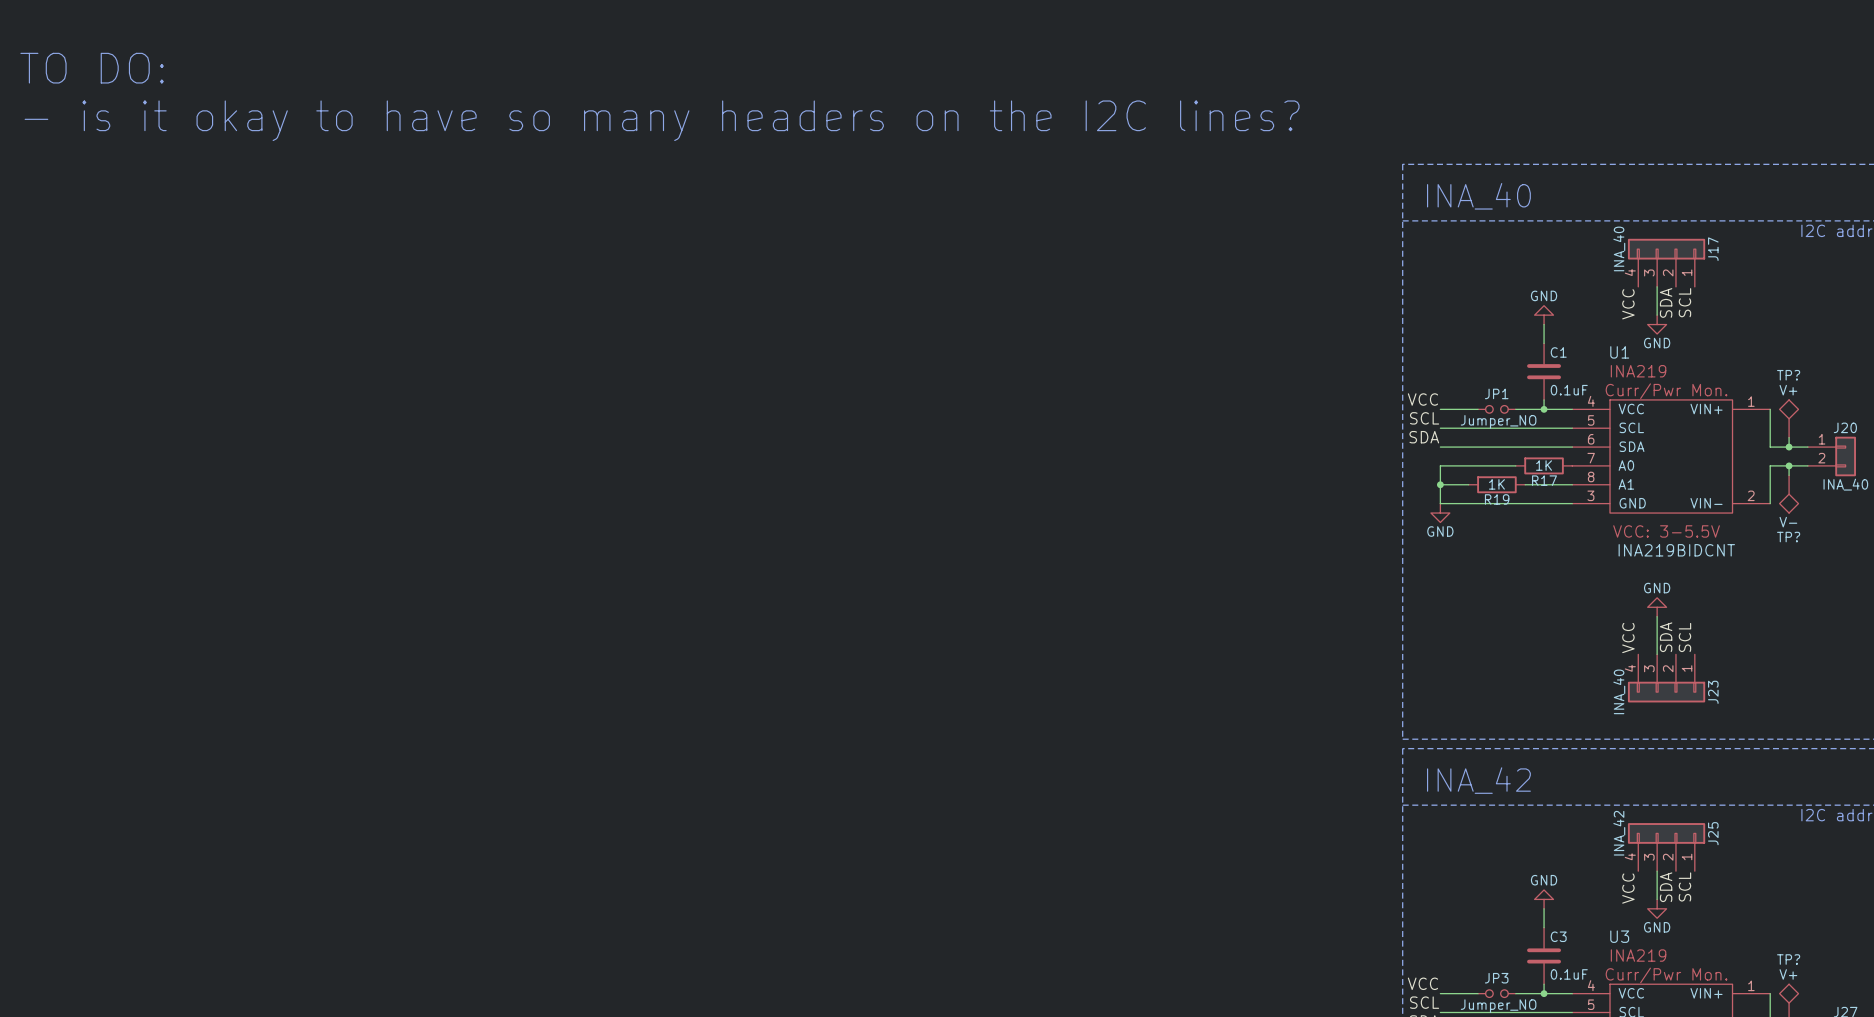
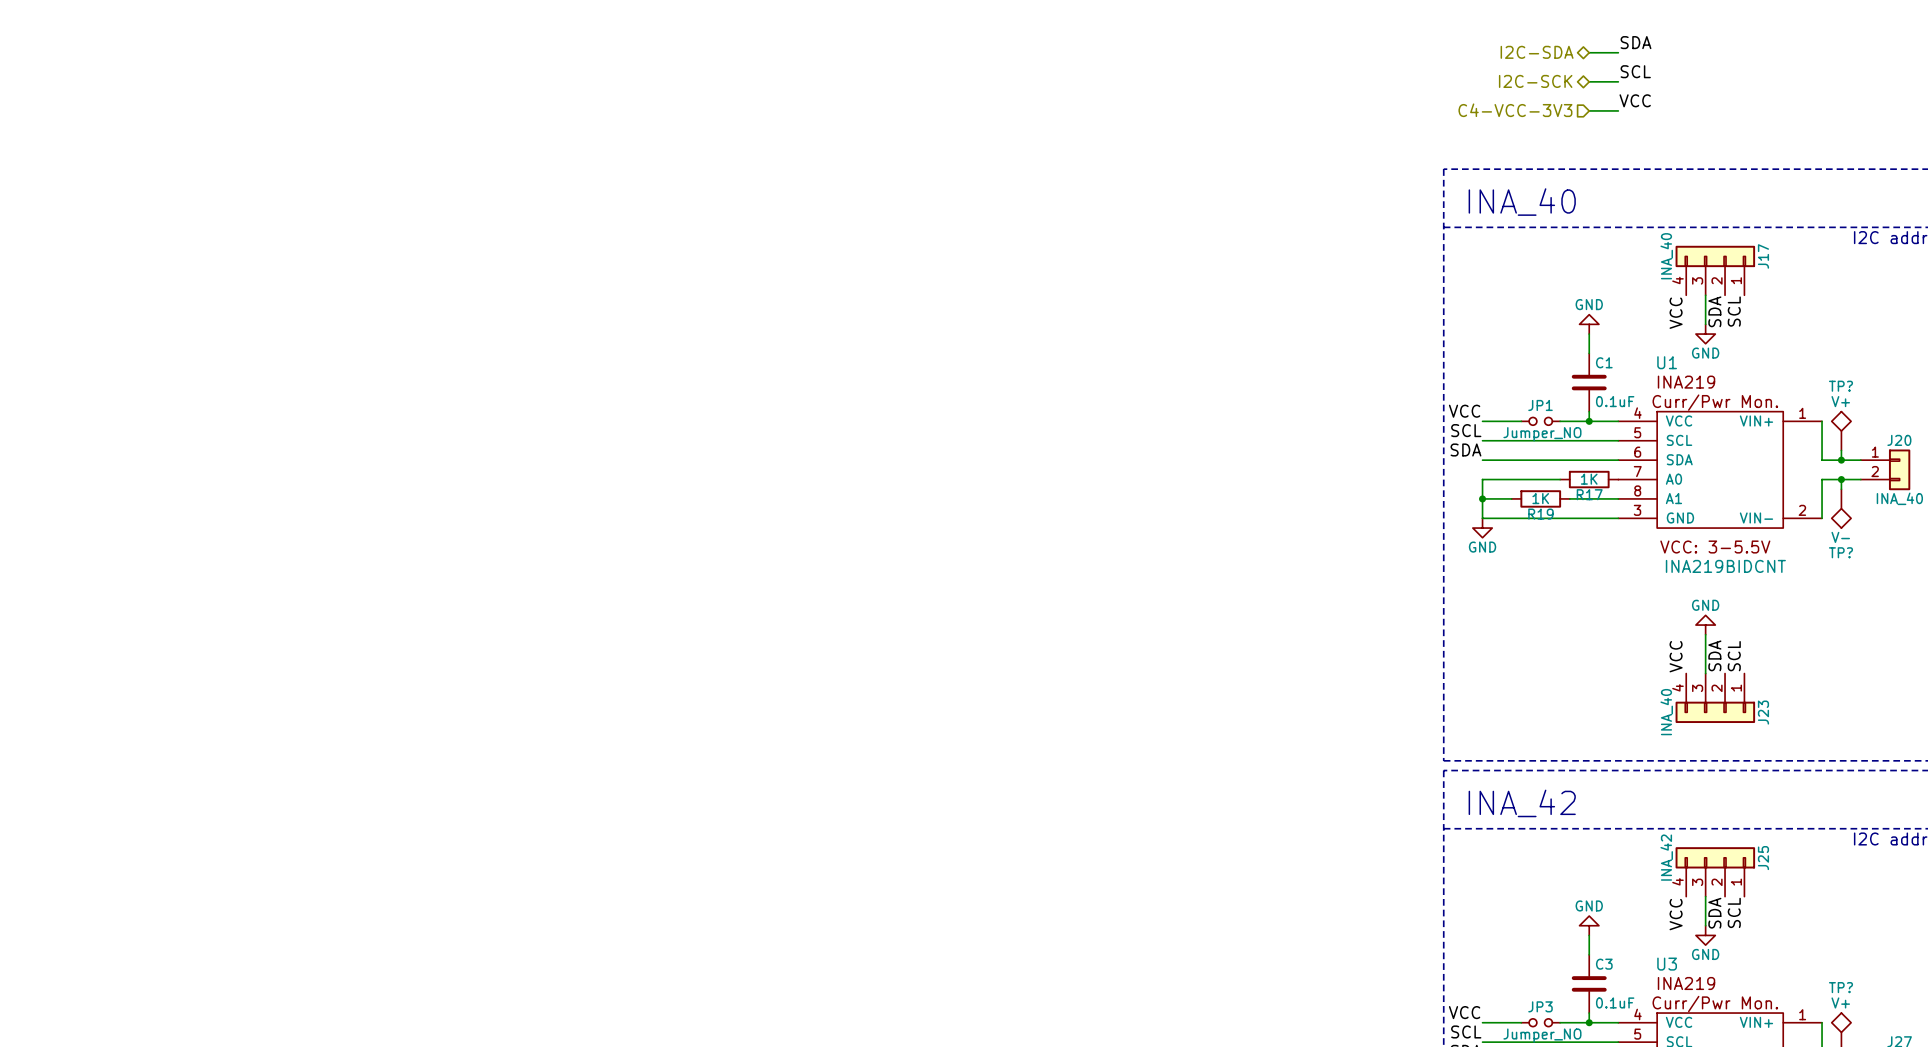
label: none -> SDA (1636, 42)
hierarchical label: none -> I2C-SDA (1537, 52)
wire: none -> (1589, 52) (1618, 52)
text: TO DO: (92, 68) -> none
label: none -> SCL (1635, 71)
hierarchical label: none -> I2C-SCK (1535, 81)
wire: none -> (1589, 81) (1618, 81)
label: none -> VCC (1635, 100)
hierarchical label: none -> C4-VCC-3V3 (1515, 110)
wire: none -> (1589, 110) (1618, 110)
text: - is it okay to have so many headers on the I2C lines? (662, 120) -> none

